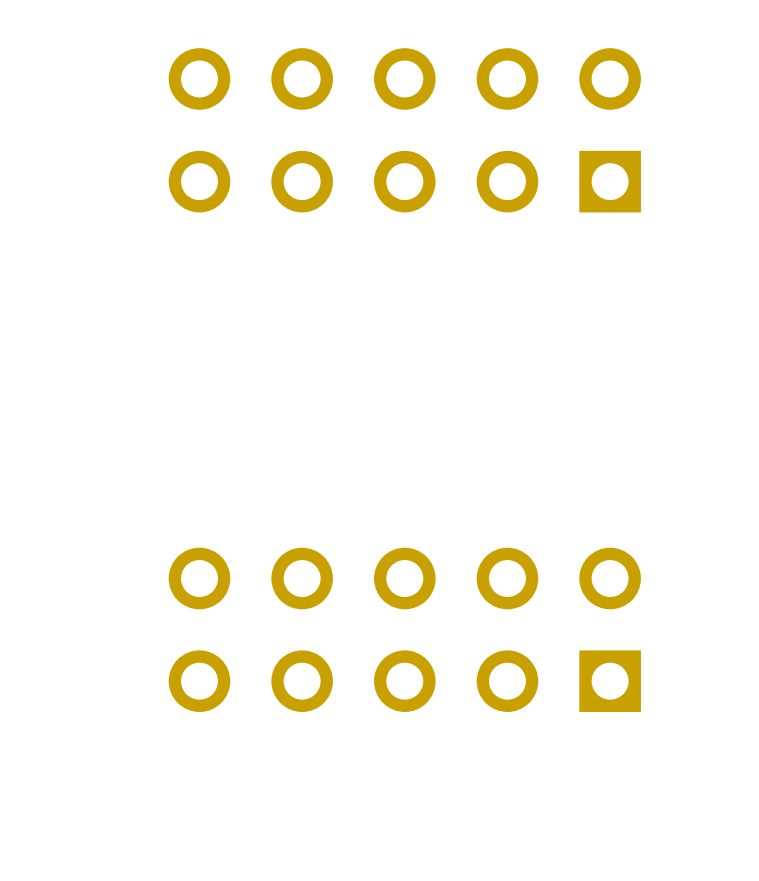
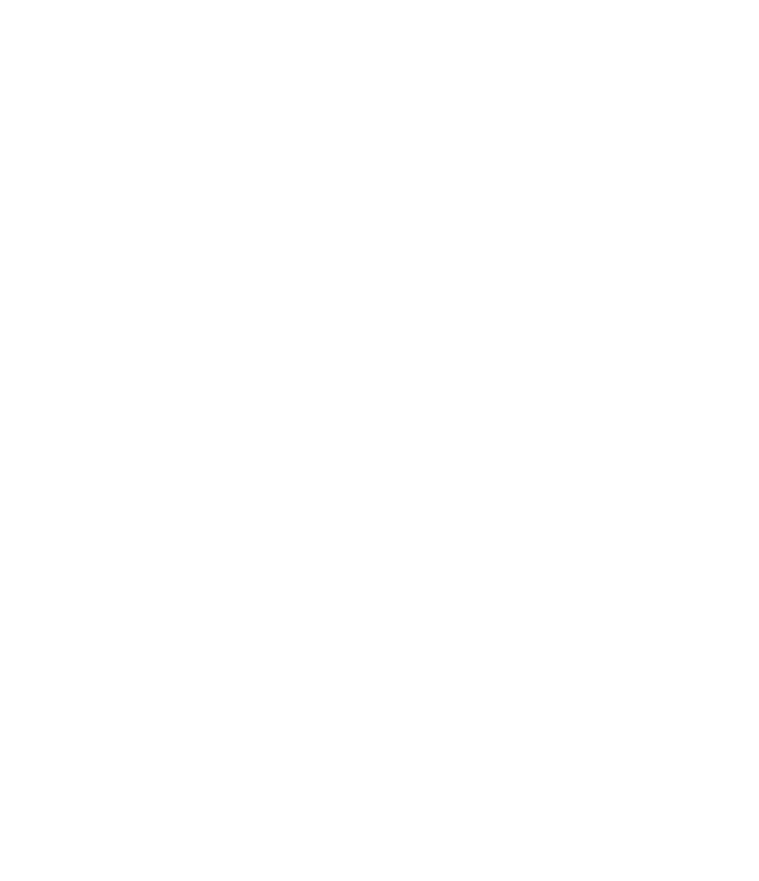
part: (404, 130) -> none
part: (404, 629) -> none

